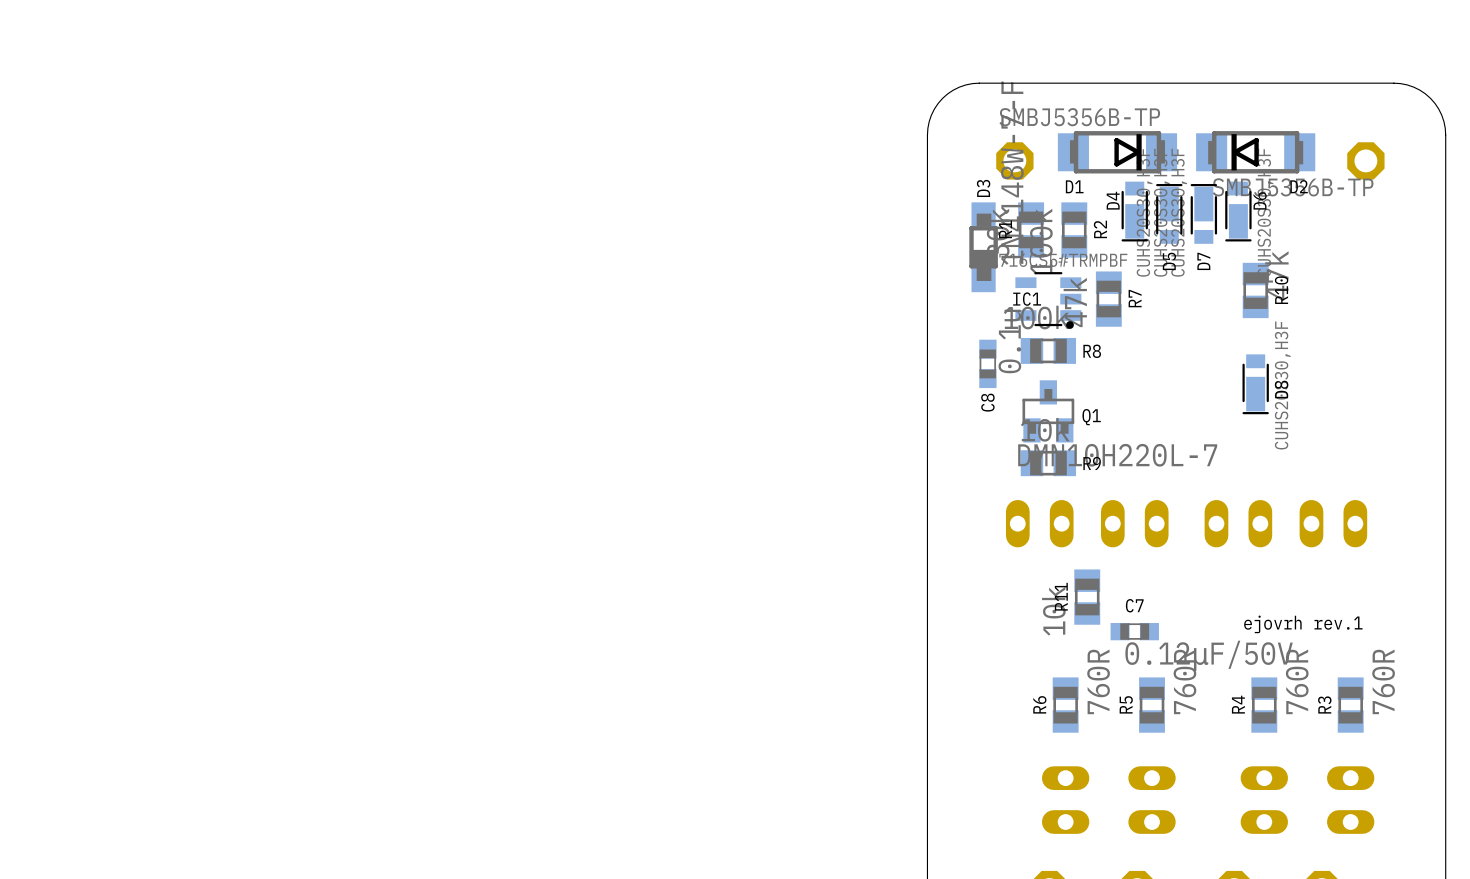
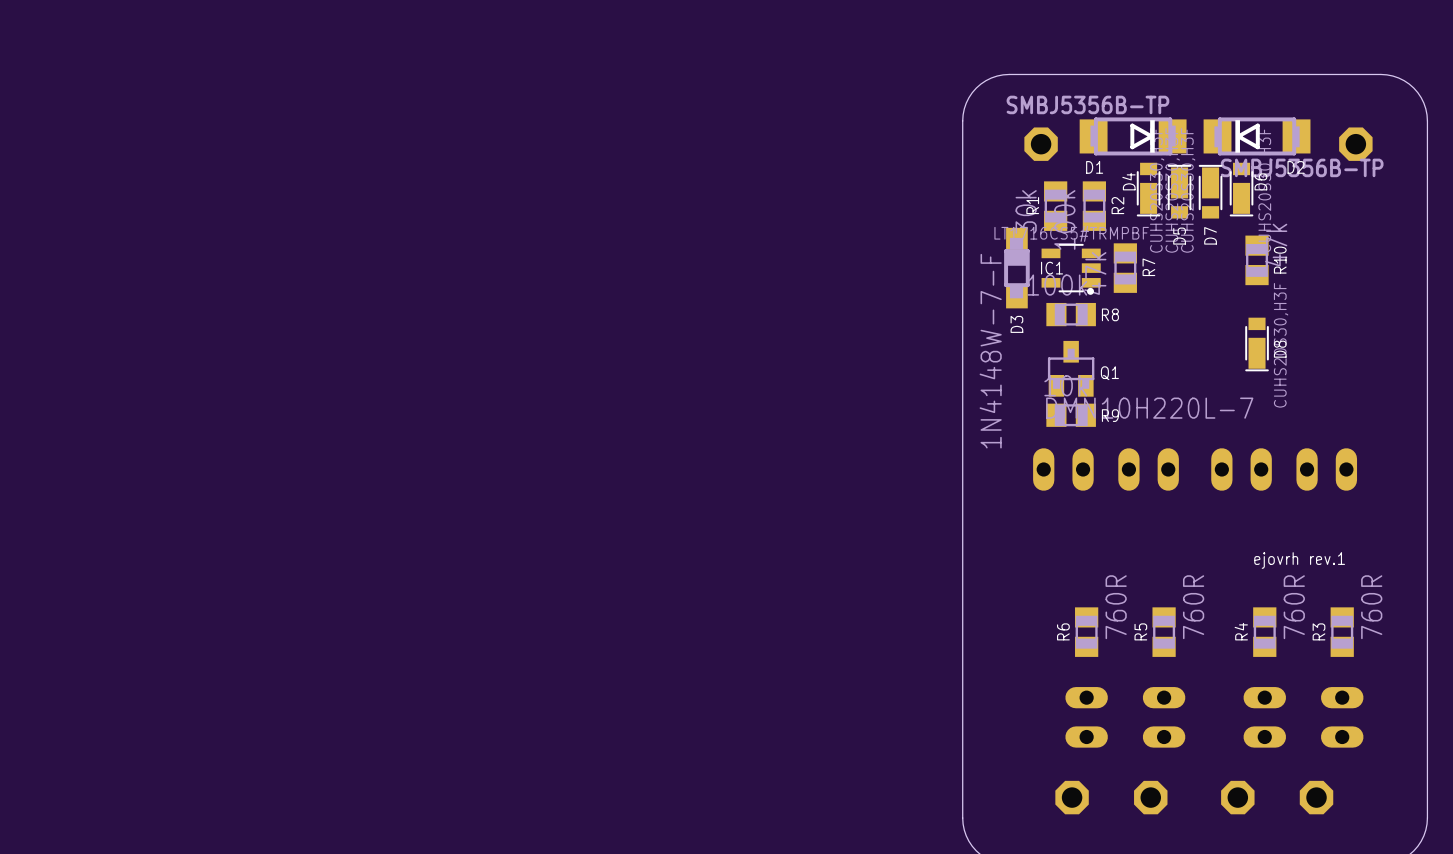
D3 rotation: 0° (983, 247) -> 180° (1016, 268)
C8: 0.1u (987, 363) -> none
R11: 10k (1087, 597) -> none
C7: 0.12μF/50V (1134, 631) -> none

